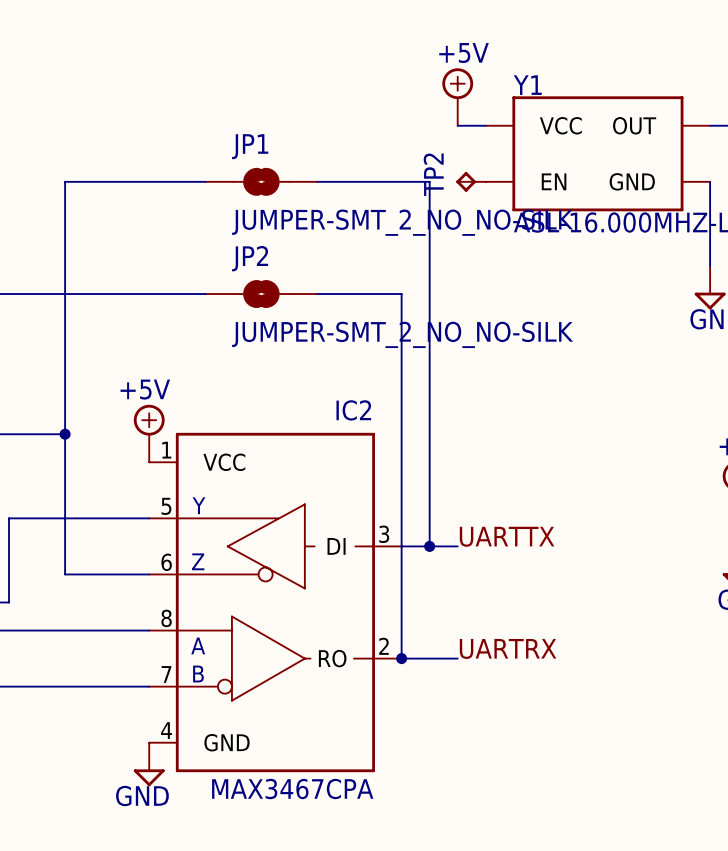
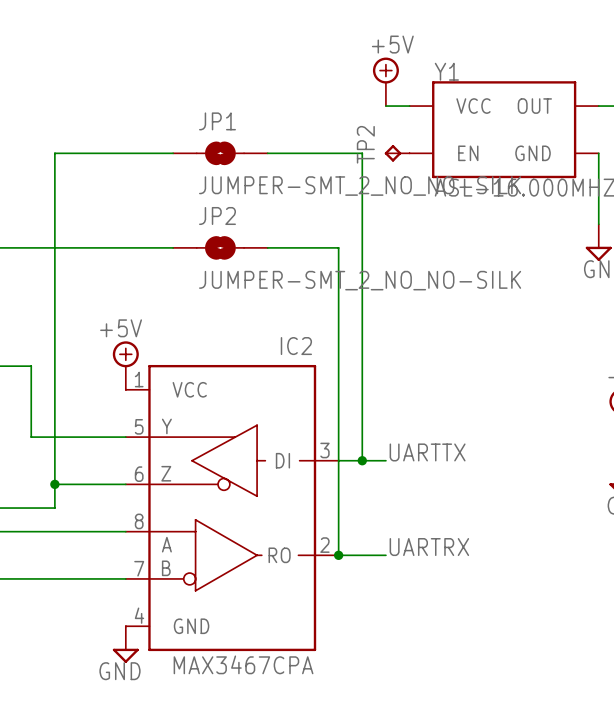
wire: (37, 434) (65, 434) -> (31, 366) (31, 437)
junction: (65, 434) -> none
wire: (37, 518) (9, 518) (9, 602) -> (54, 484) (54, 508) (7, 508)
junction: none -> (54, 484)

